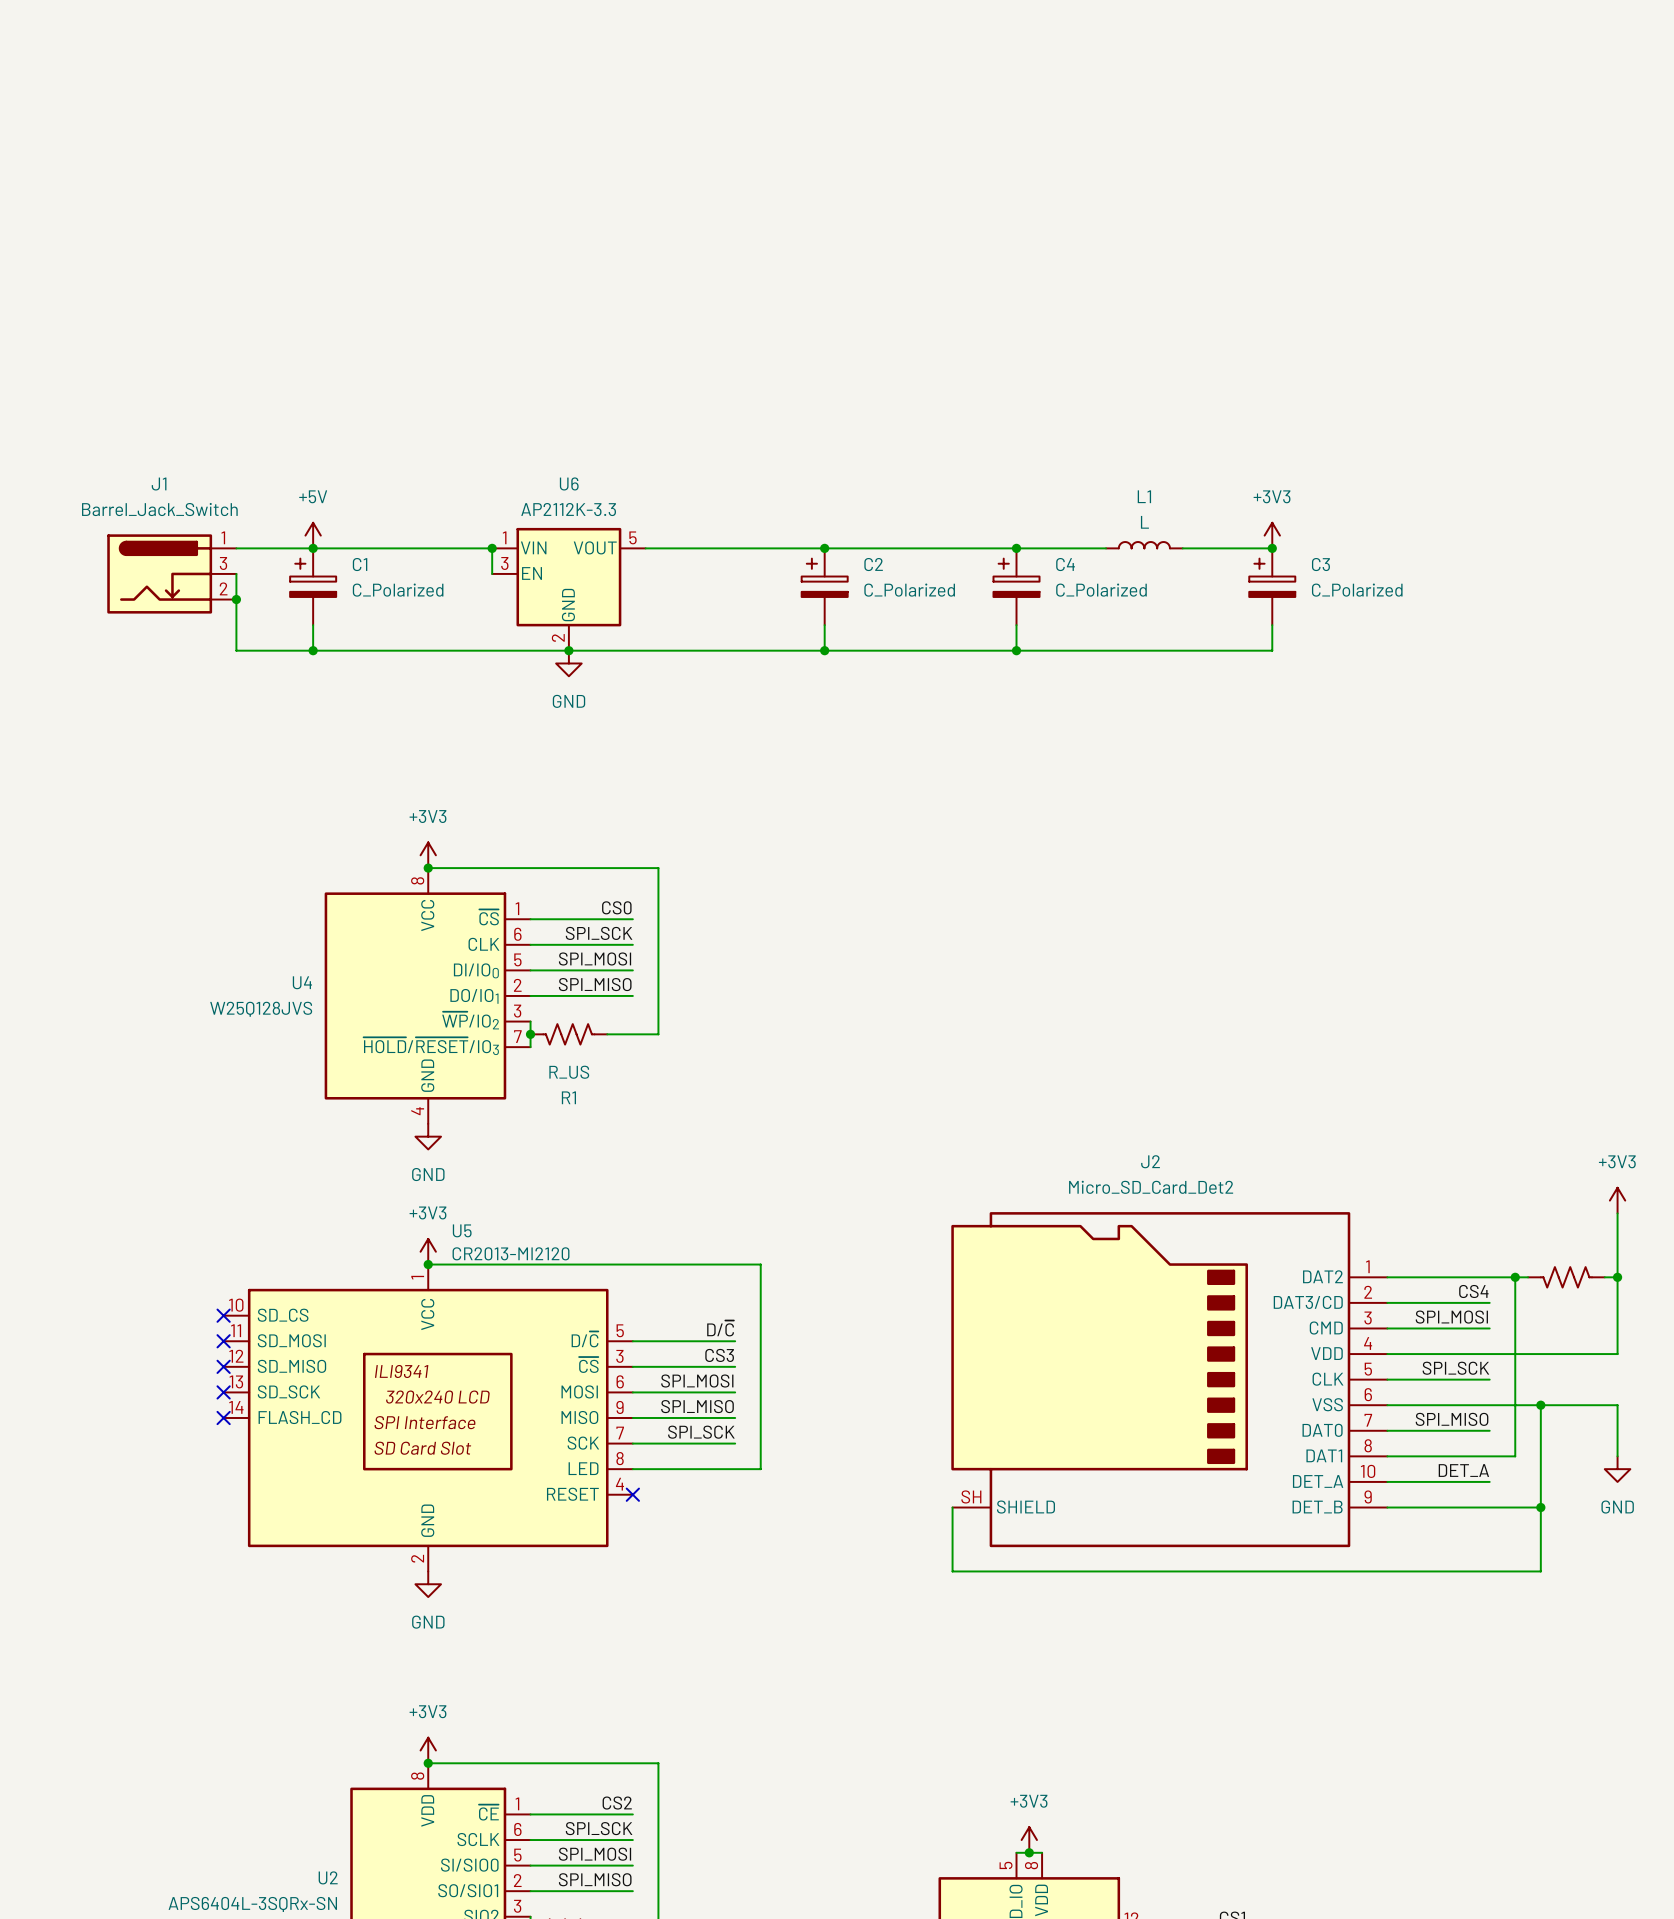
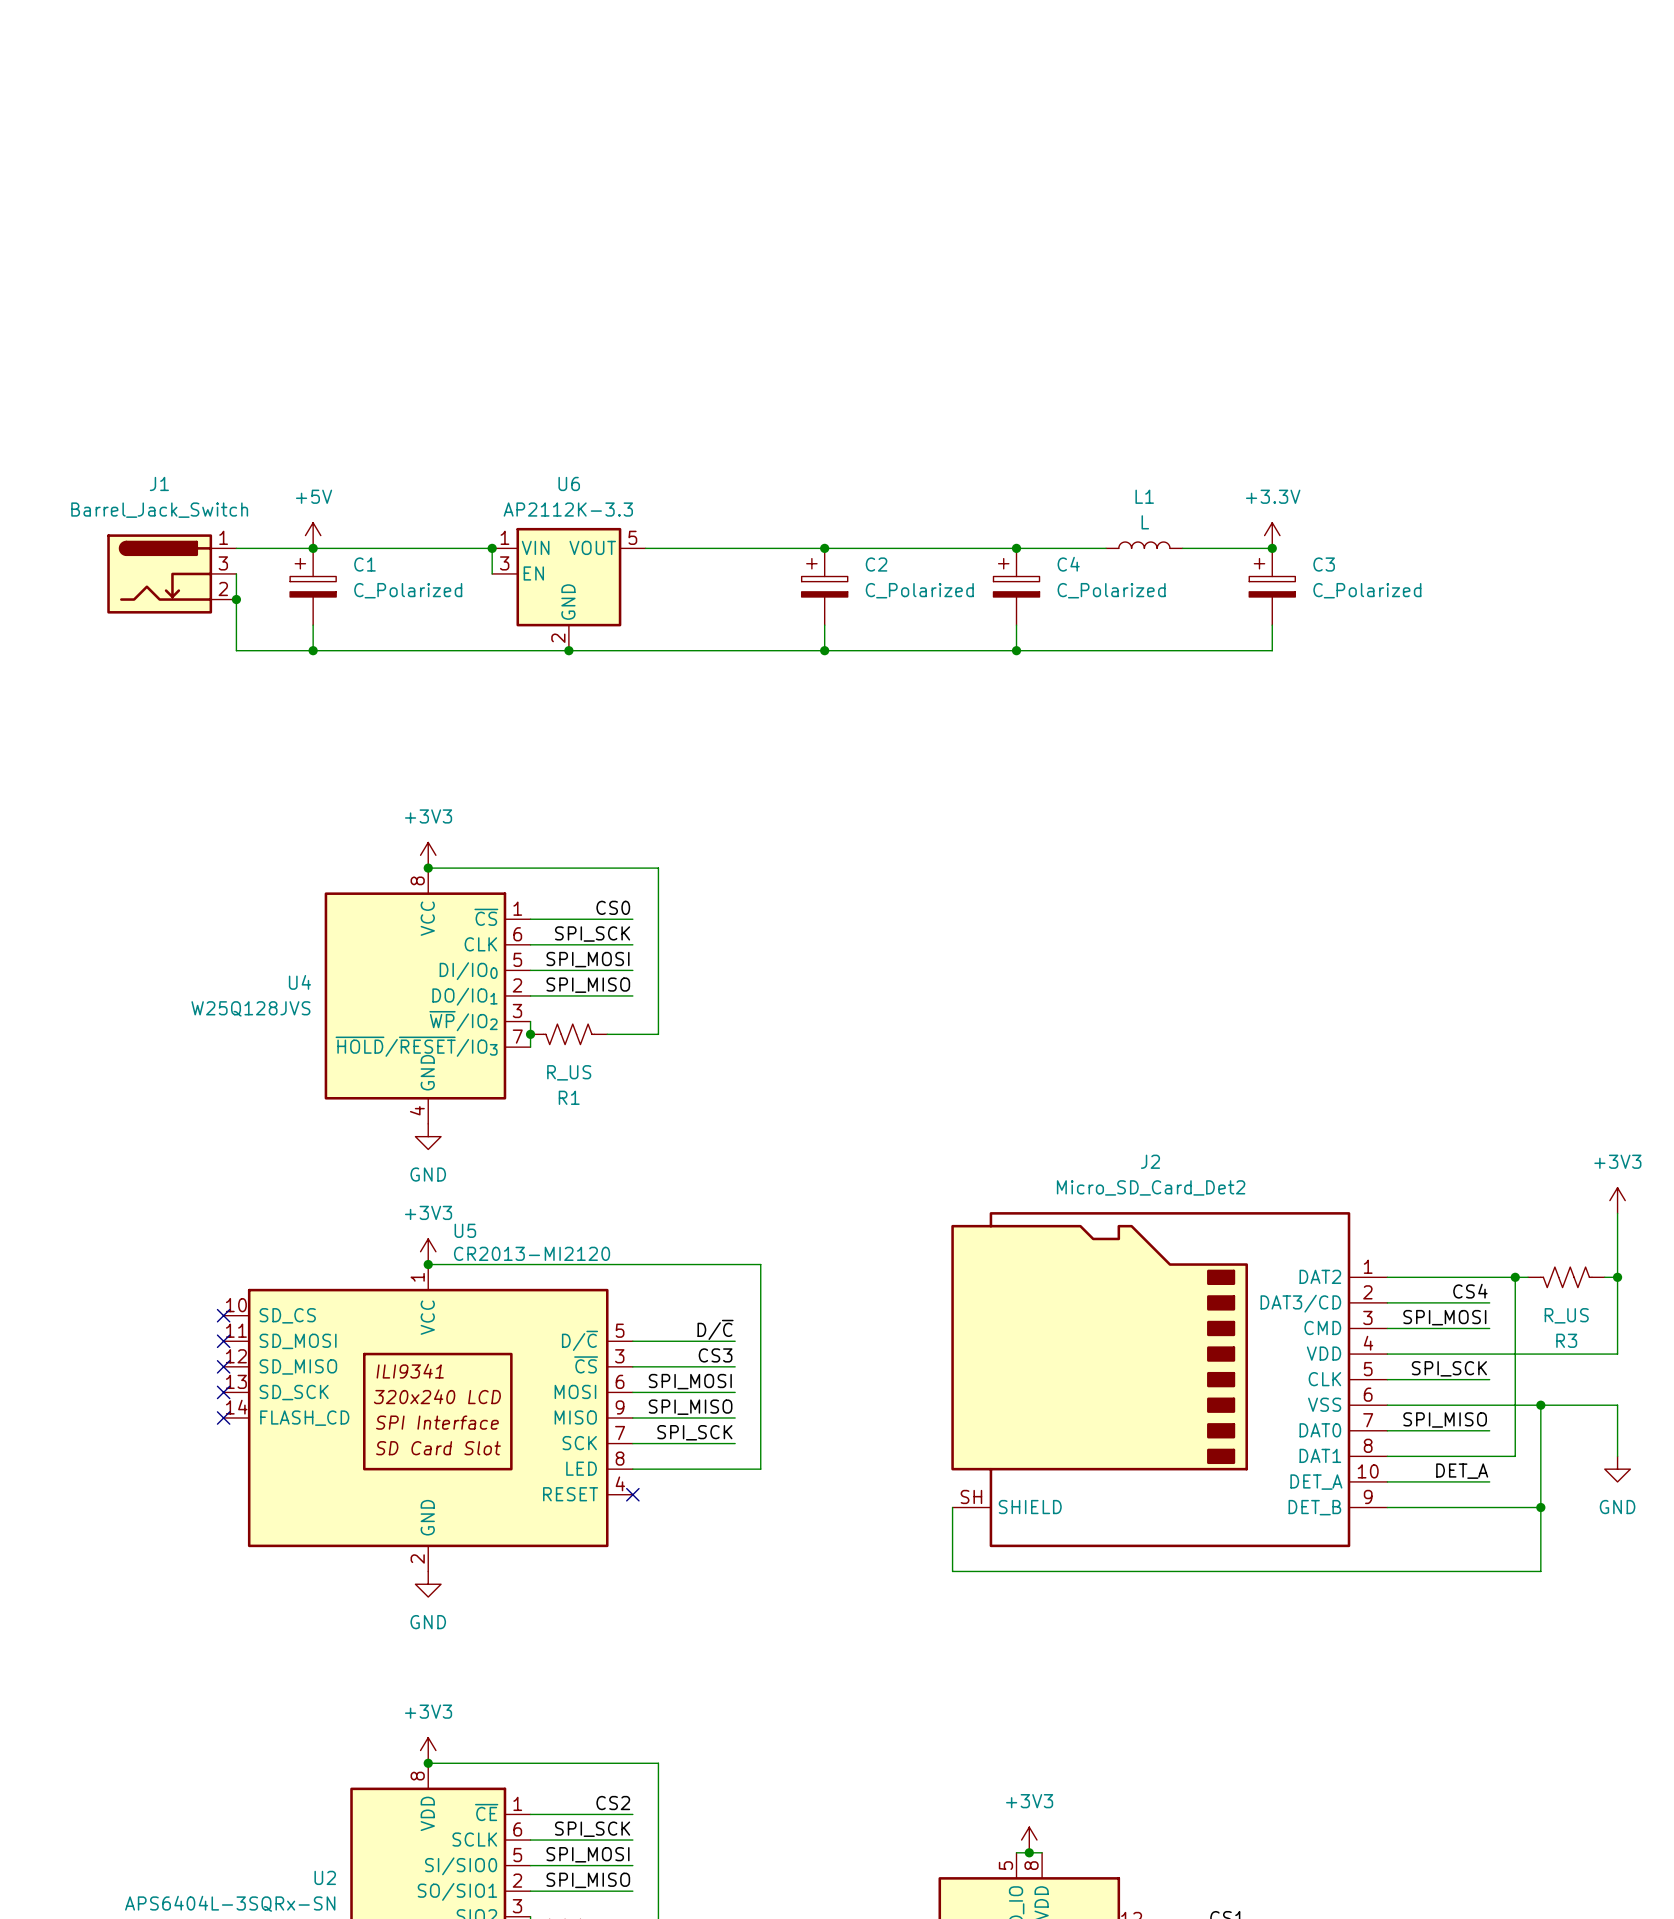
power symbol: +3V3 (1272, 535) -> +3.3V (1272, 535)
power symbol: GND (568, 663) -> none
R3 value: none -> R_US (1566, 1315)
R3 name: none -> R3 (1566, 1340)

